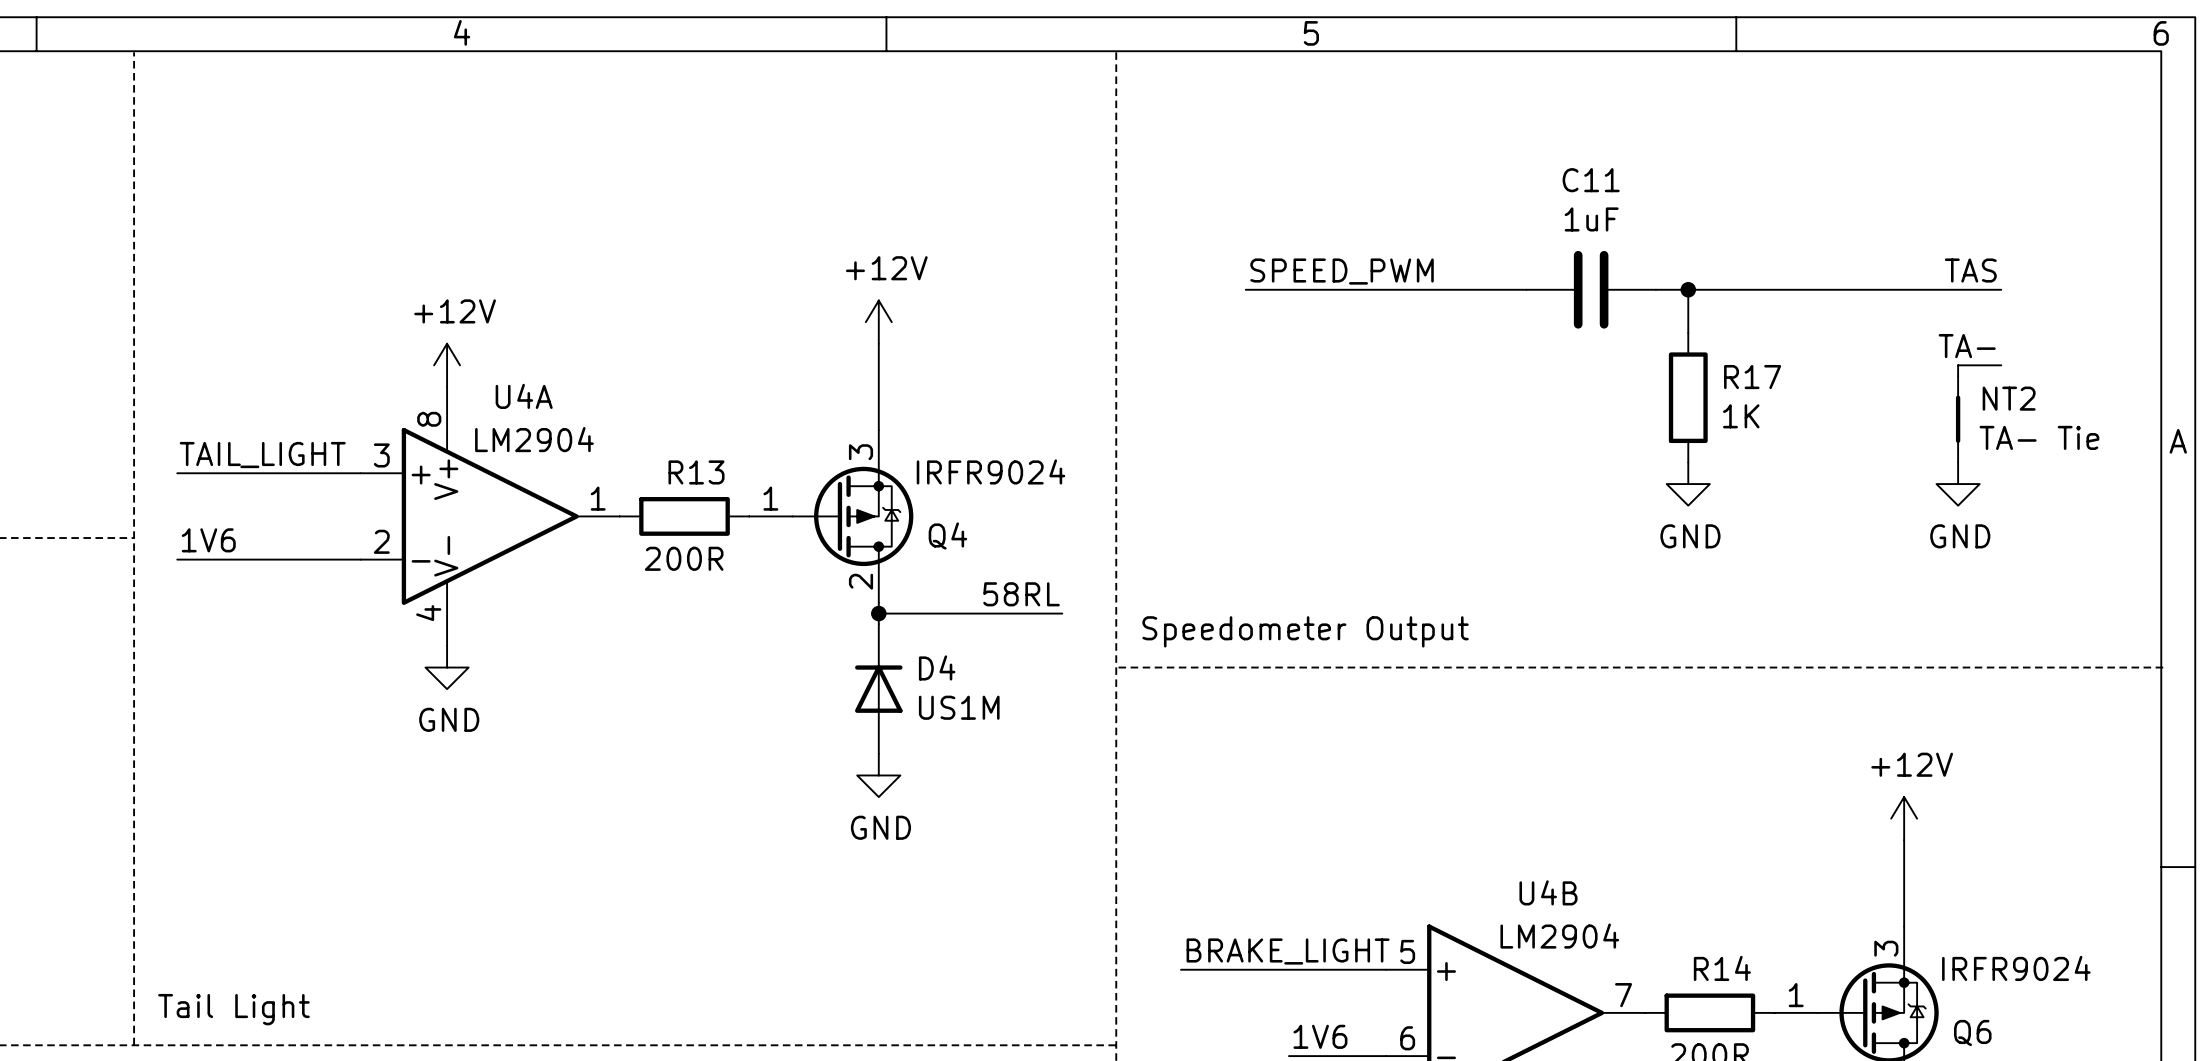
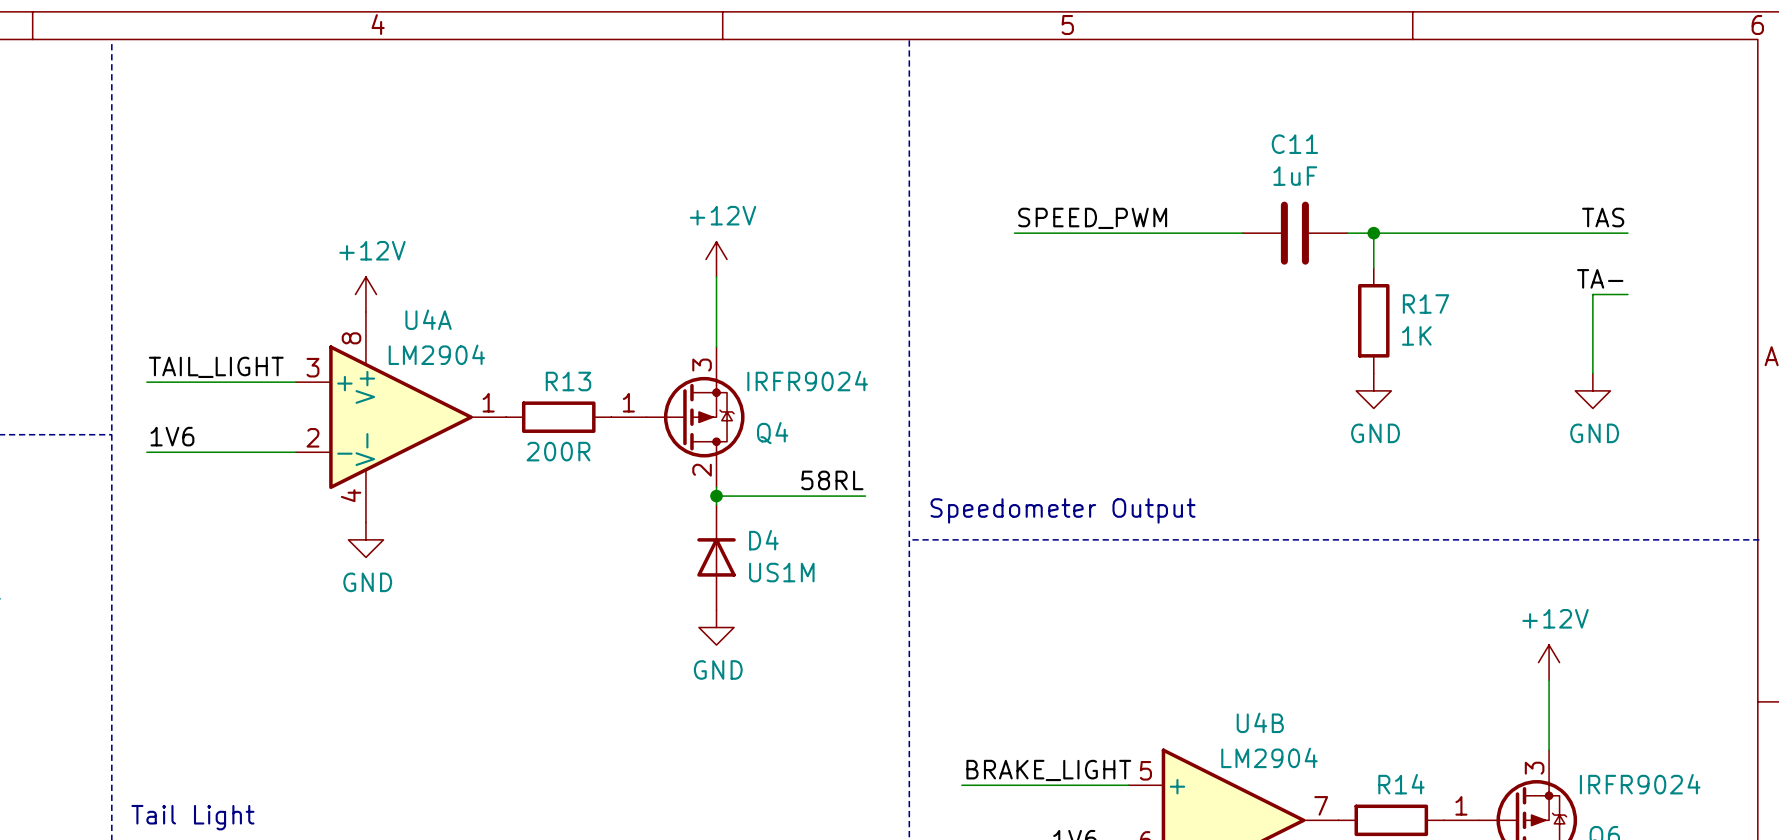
NT2: TA- Tie (1958, 419) -> none

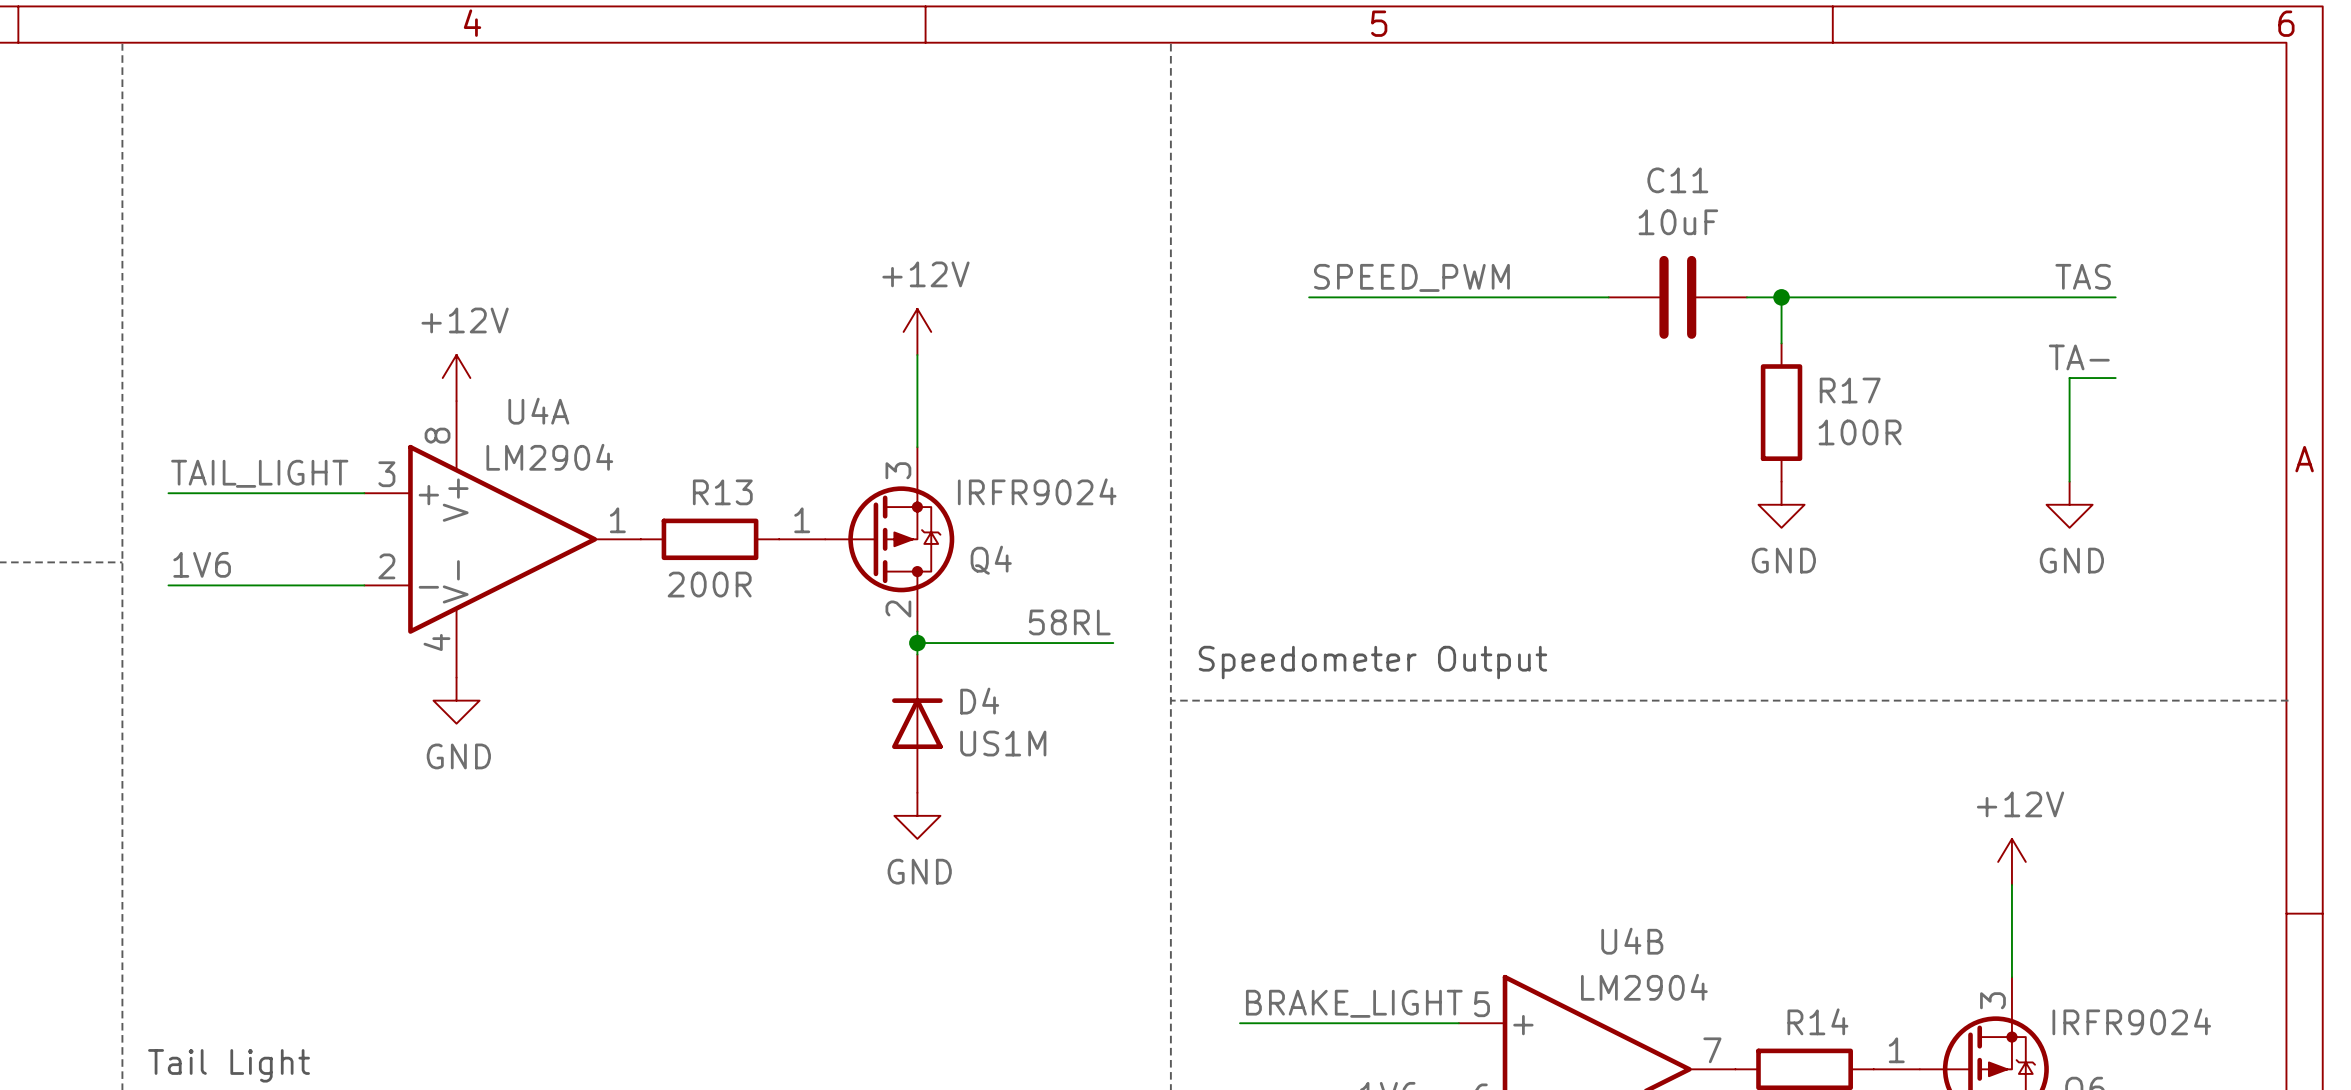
C11 value: 1uF (1295, 176) -> 10uF (1678, 222)
R17 value: 1K (1416, 335) -> 100R (1860, 432)

